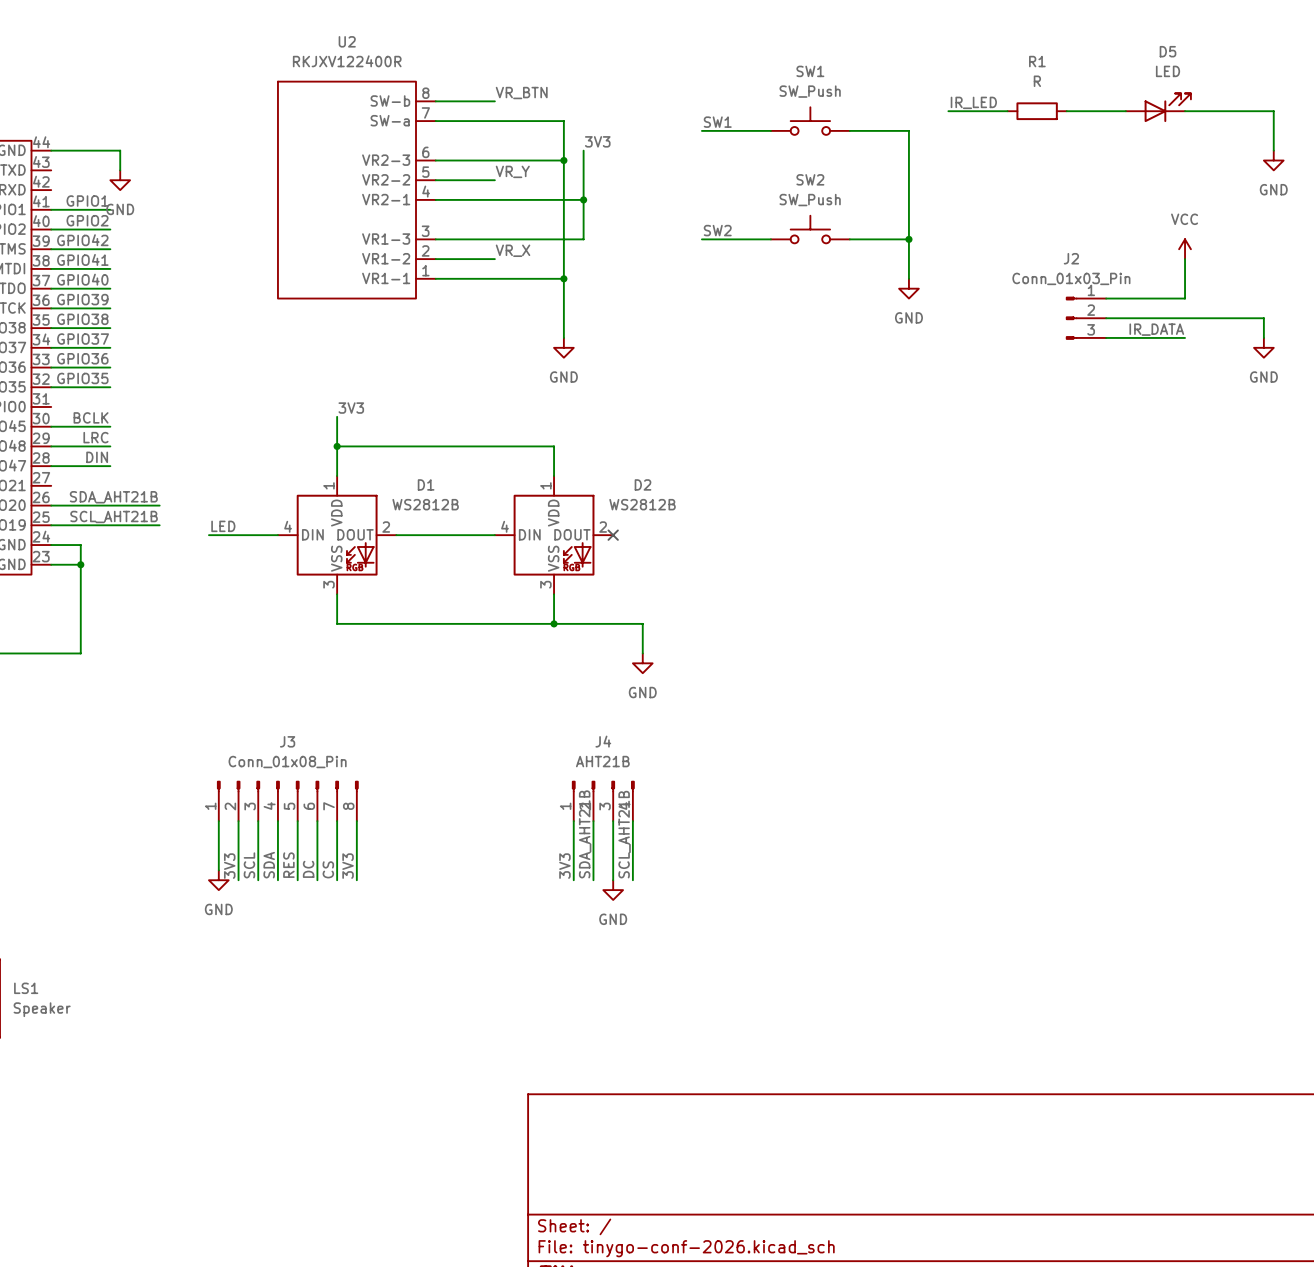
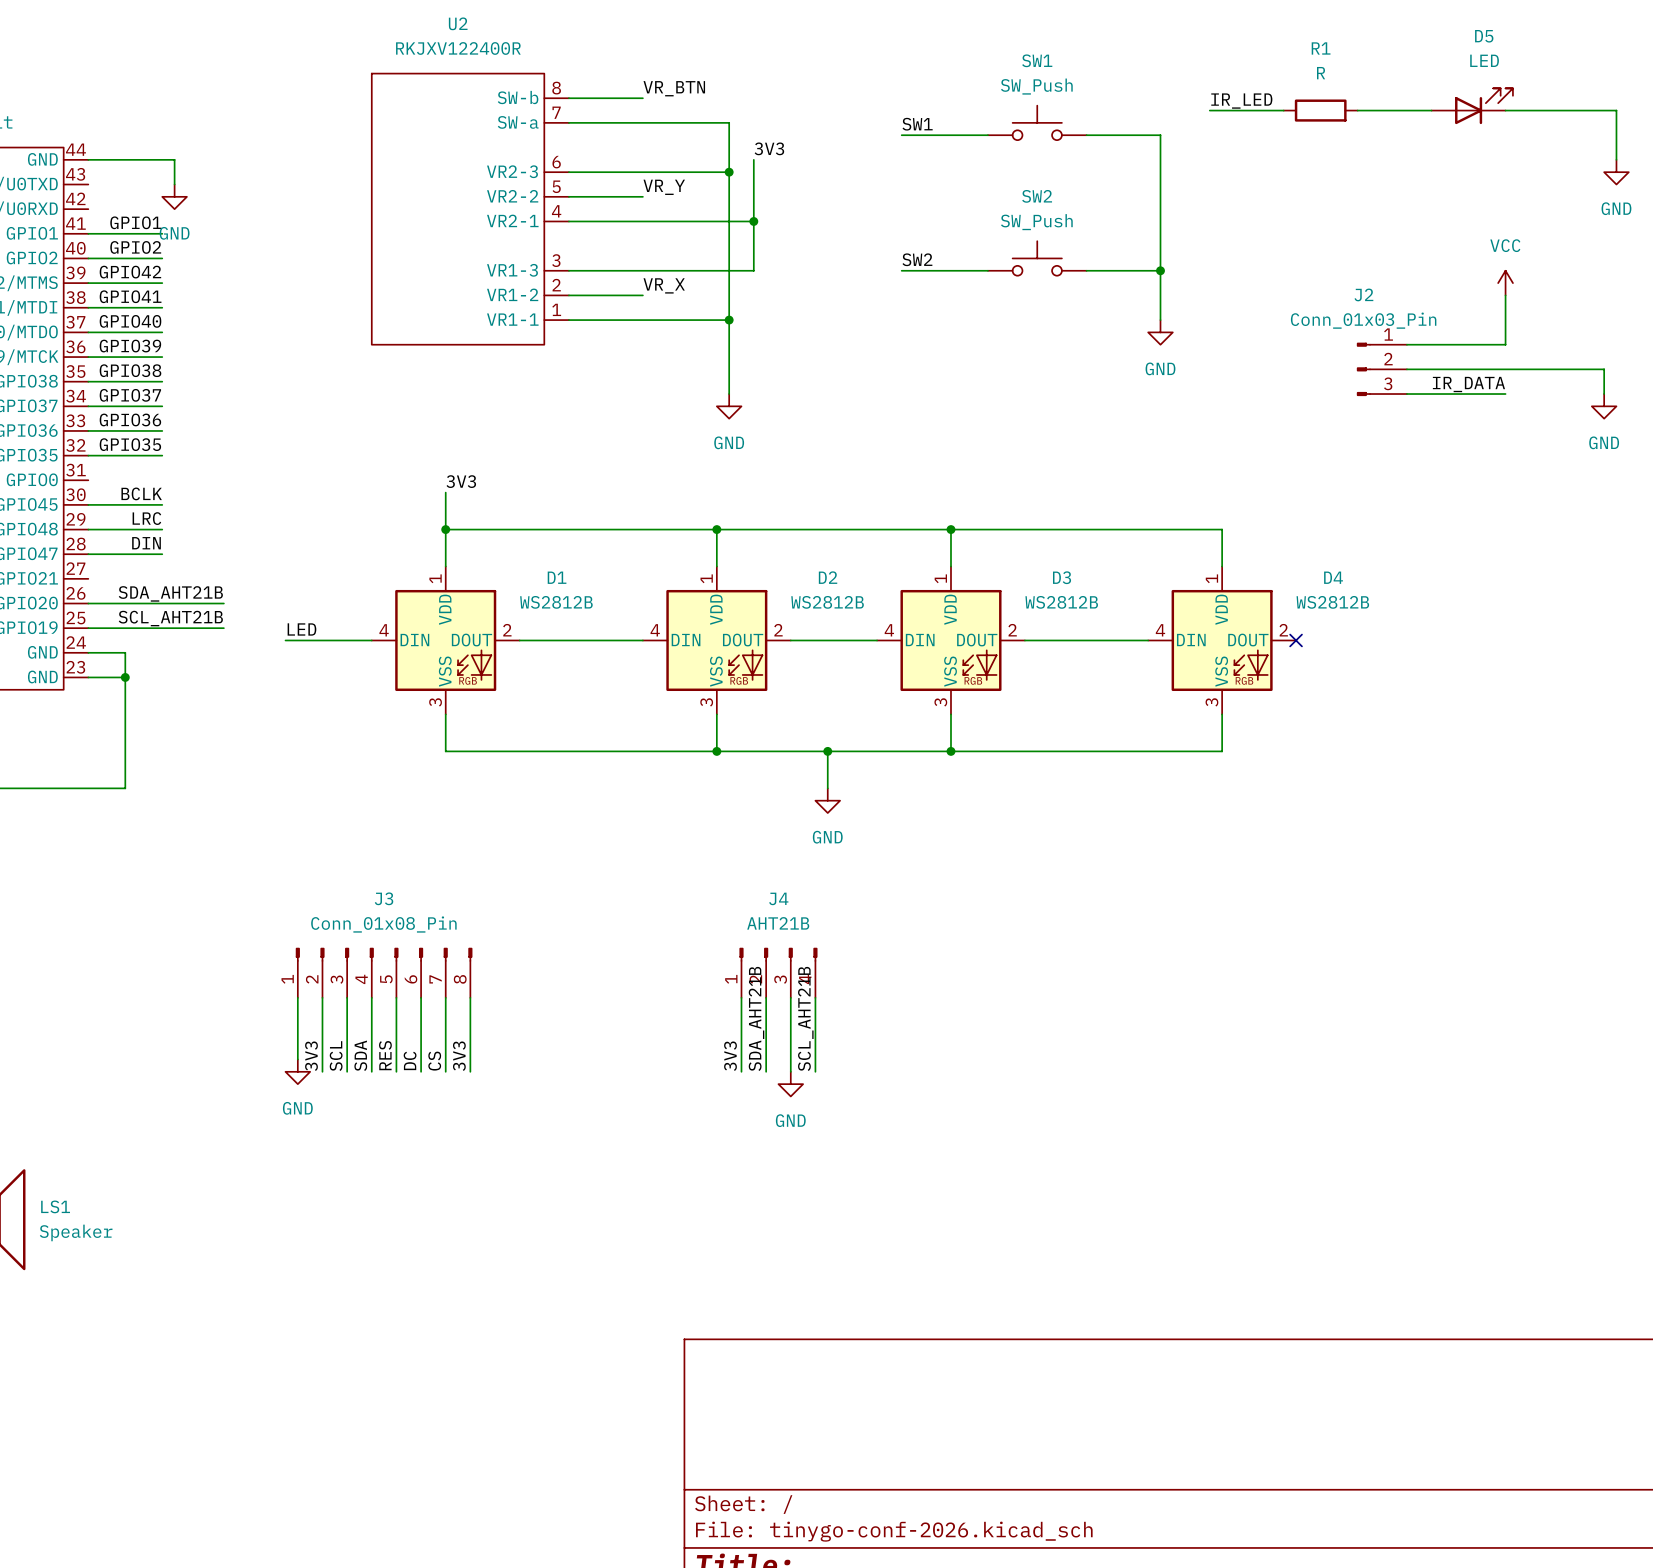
wire: none -> (716, 529) (1222, 529) (1222, 566)
junction: none -> (716, 529)
wire: none -> (950, 529) (950, 566)
junction: none -> (950, 529)
wire: none -> (790, 640) (877, 640)
no-connect mark: (613, 535) -> none
D3: none -> WS2812B (950, 640)
wire: none -> (1024, 640) (1148, 640)
D4: none -> WS2812B (1222, 640)
no-connect mark: none -> (1296, 640)
wire: none -> (950, 714) (950, 751)
wire: none -> (1222, 714) (1222, 751) (827, 751)
junction: none -> (827, 751)
junction: none -> (950, 751)

